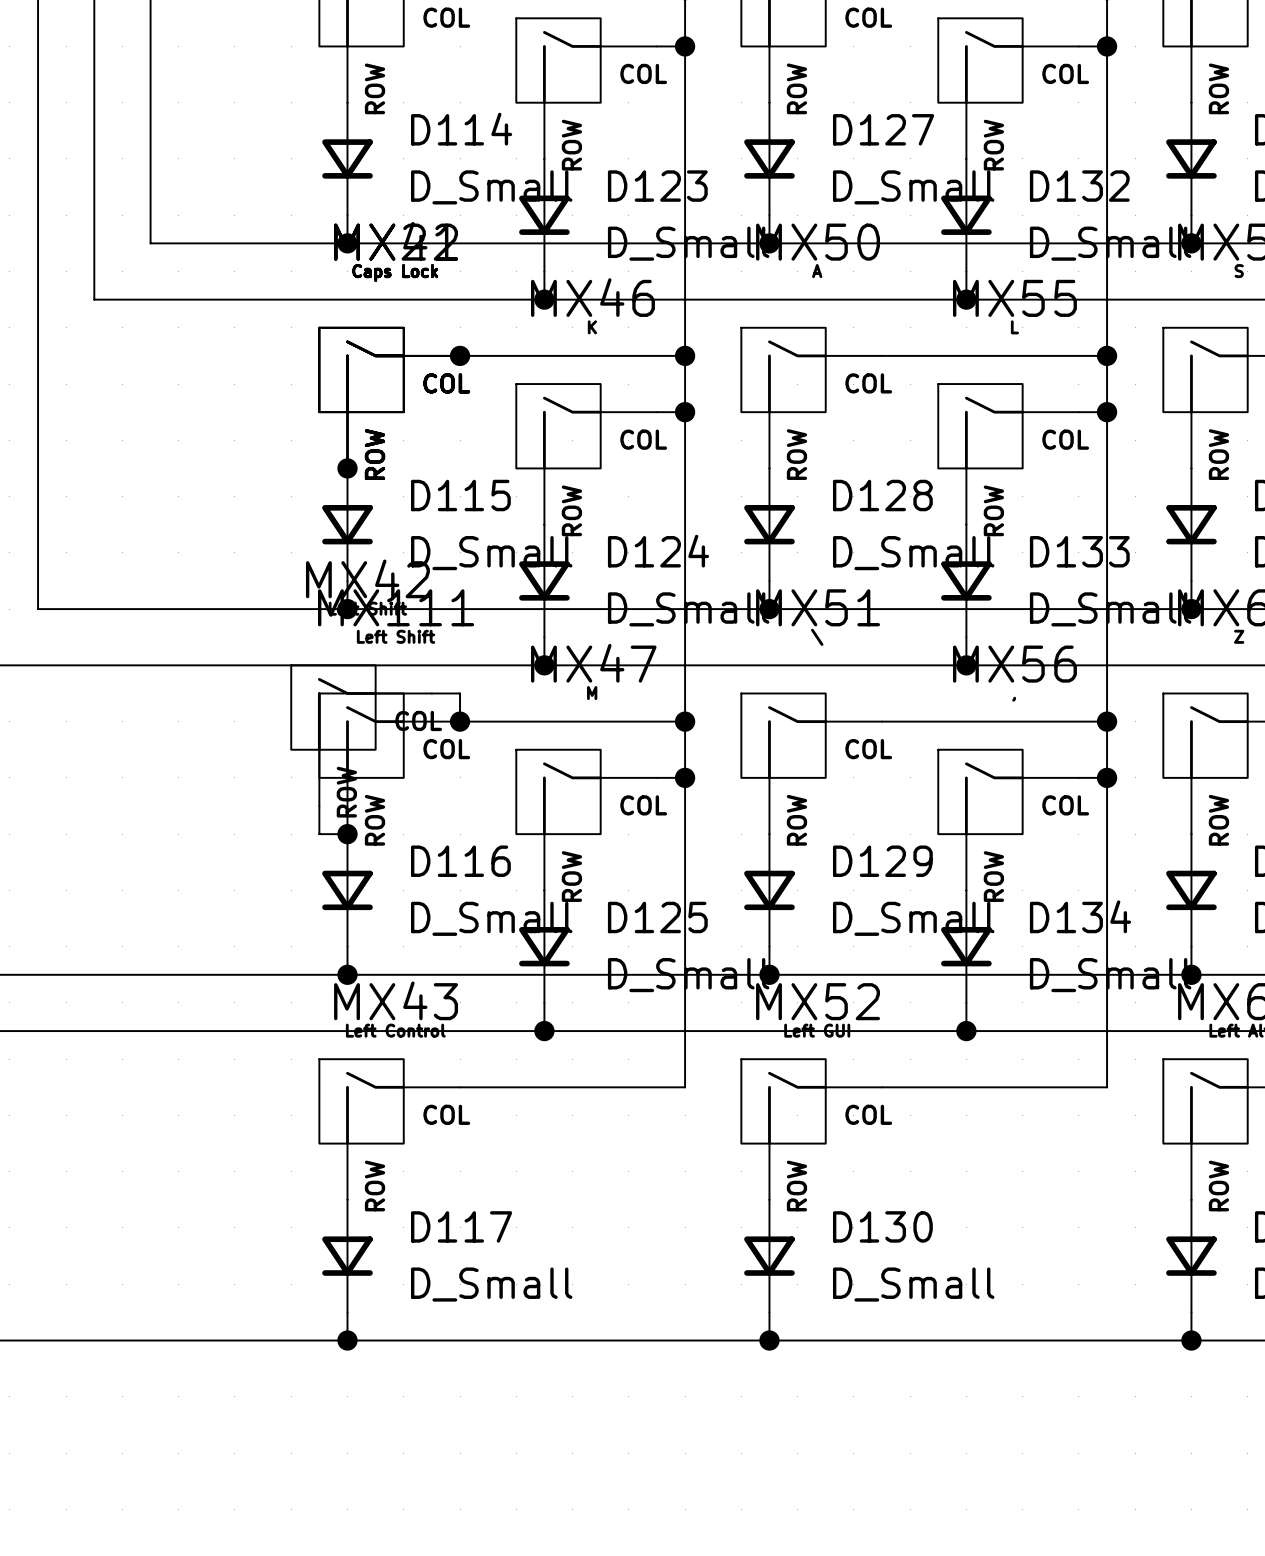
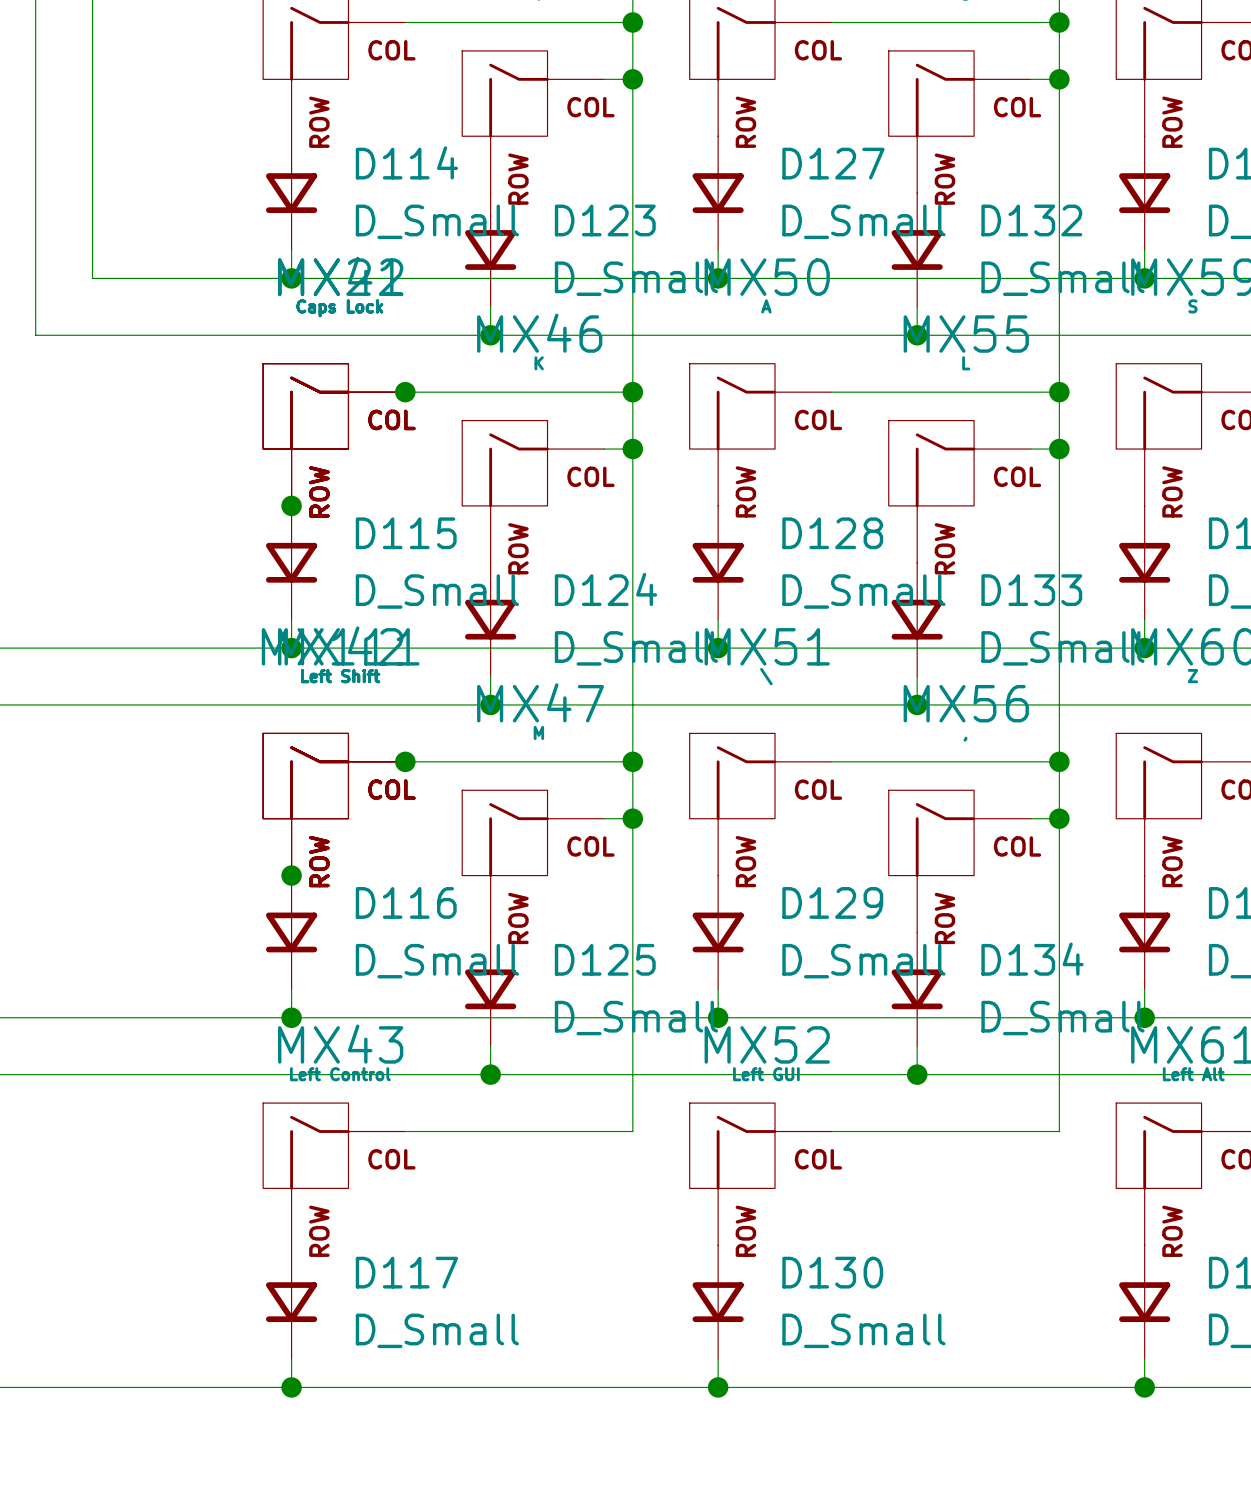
wire: (431, 693) (460, 693) (460, 721) -> none
MX42 position: (361, 735) -> (334, 804)
wire: (319, 806) (319, 834) (347, 834) -> none

